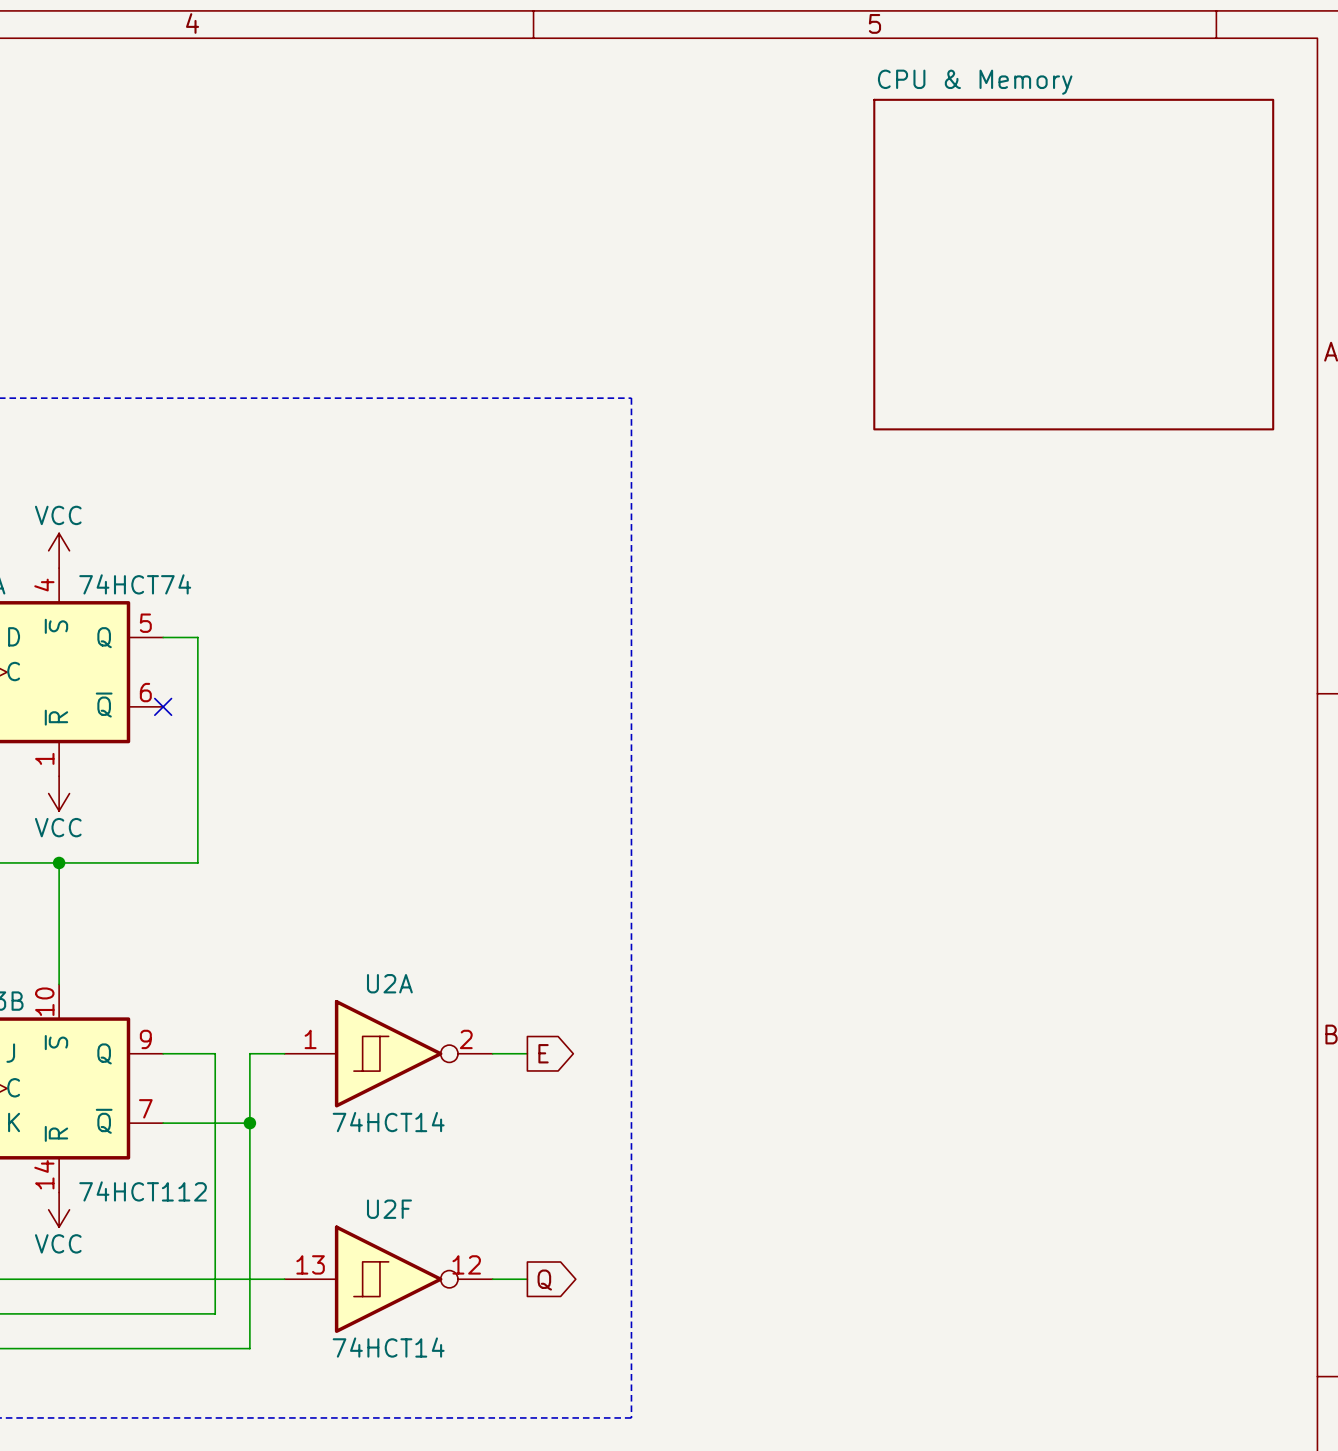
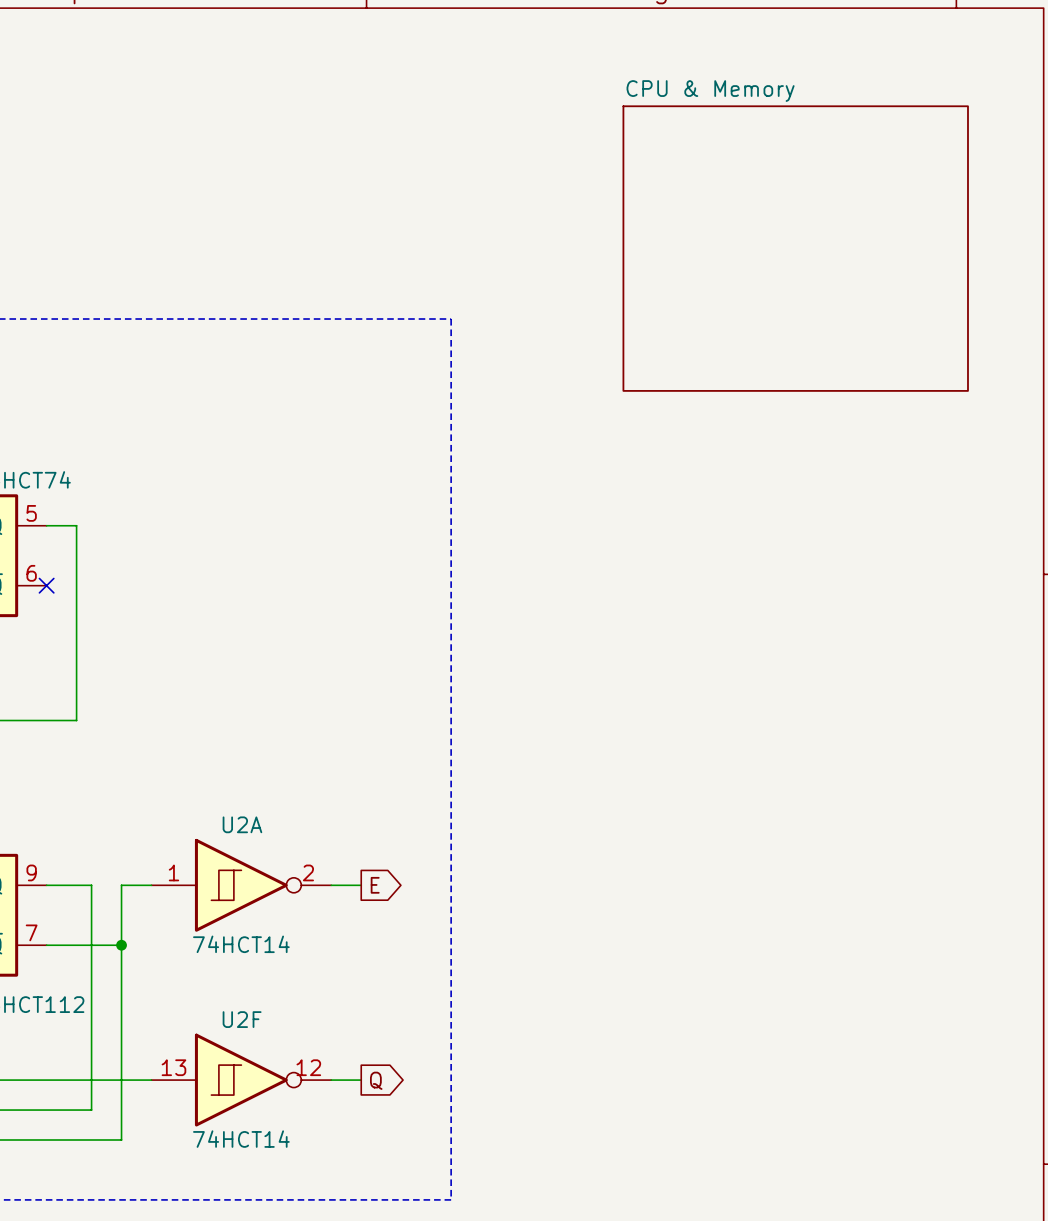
sheet CPU & Memory position: (1073, 264) -> (795, 248)

